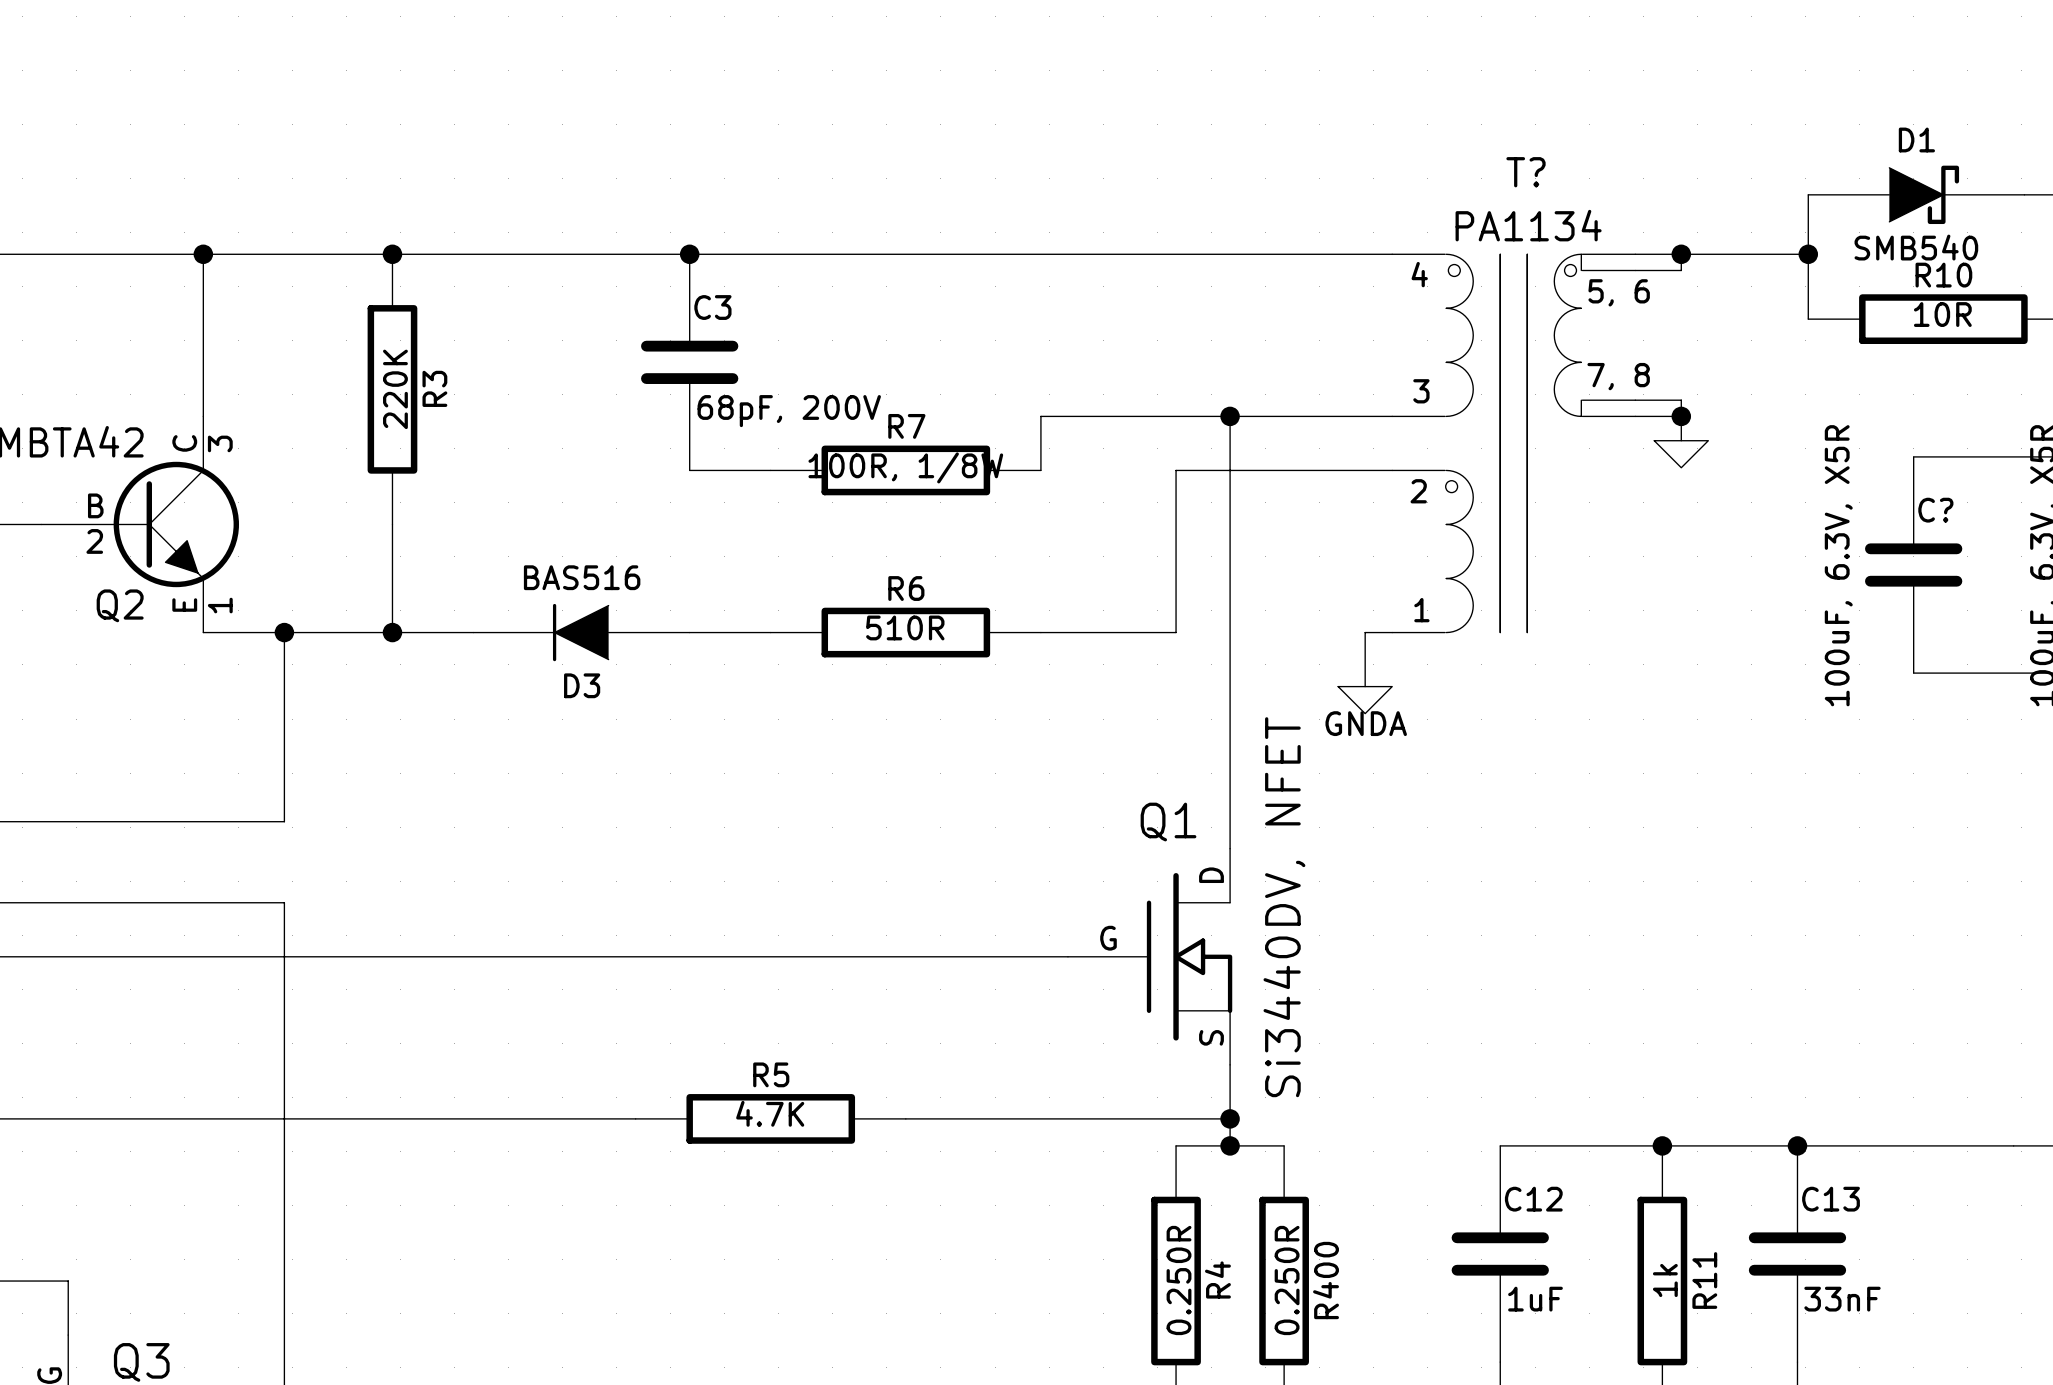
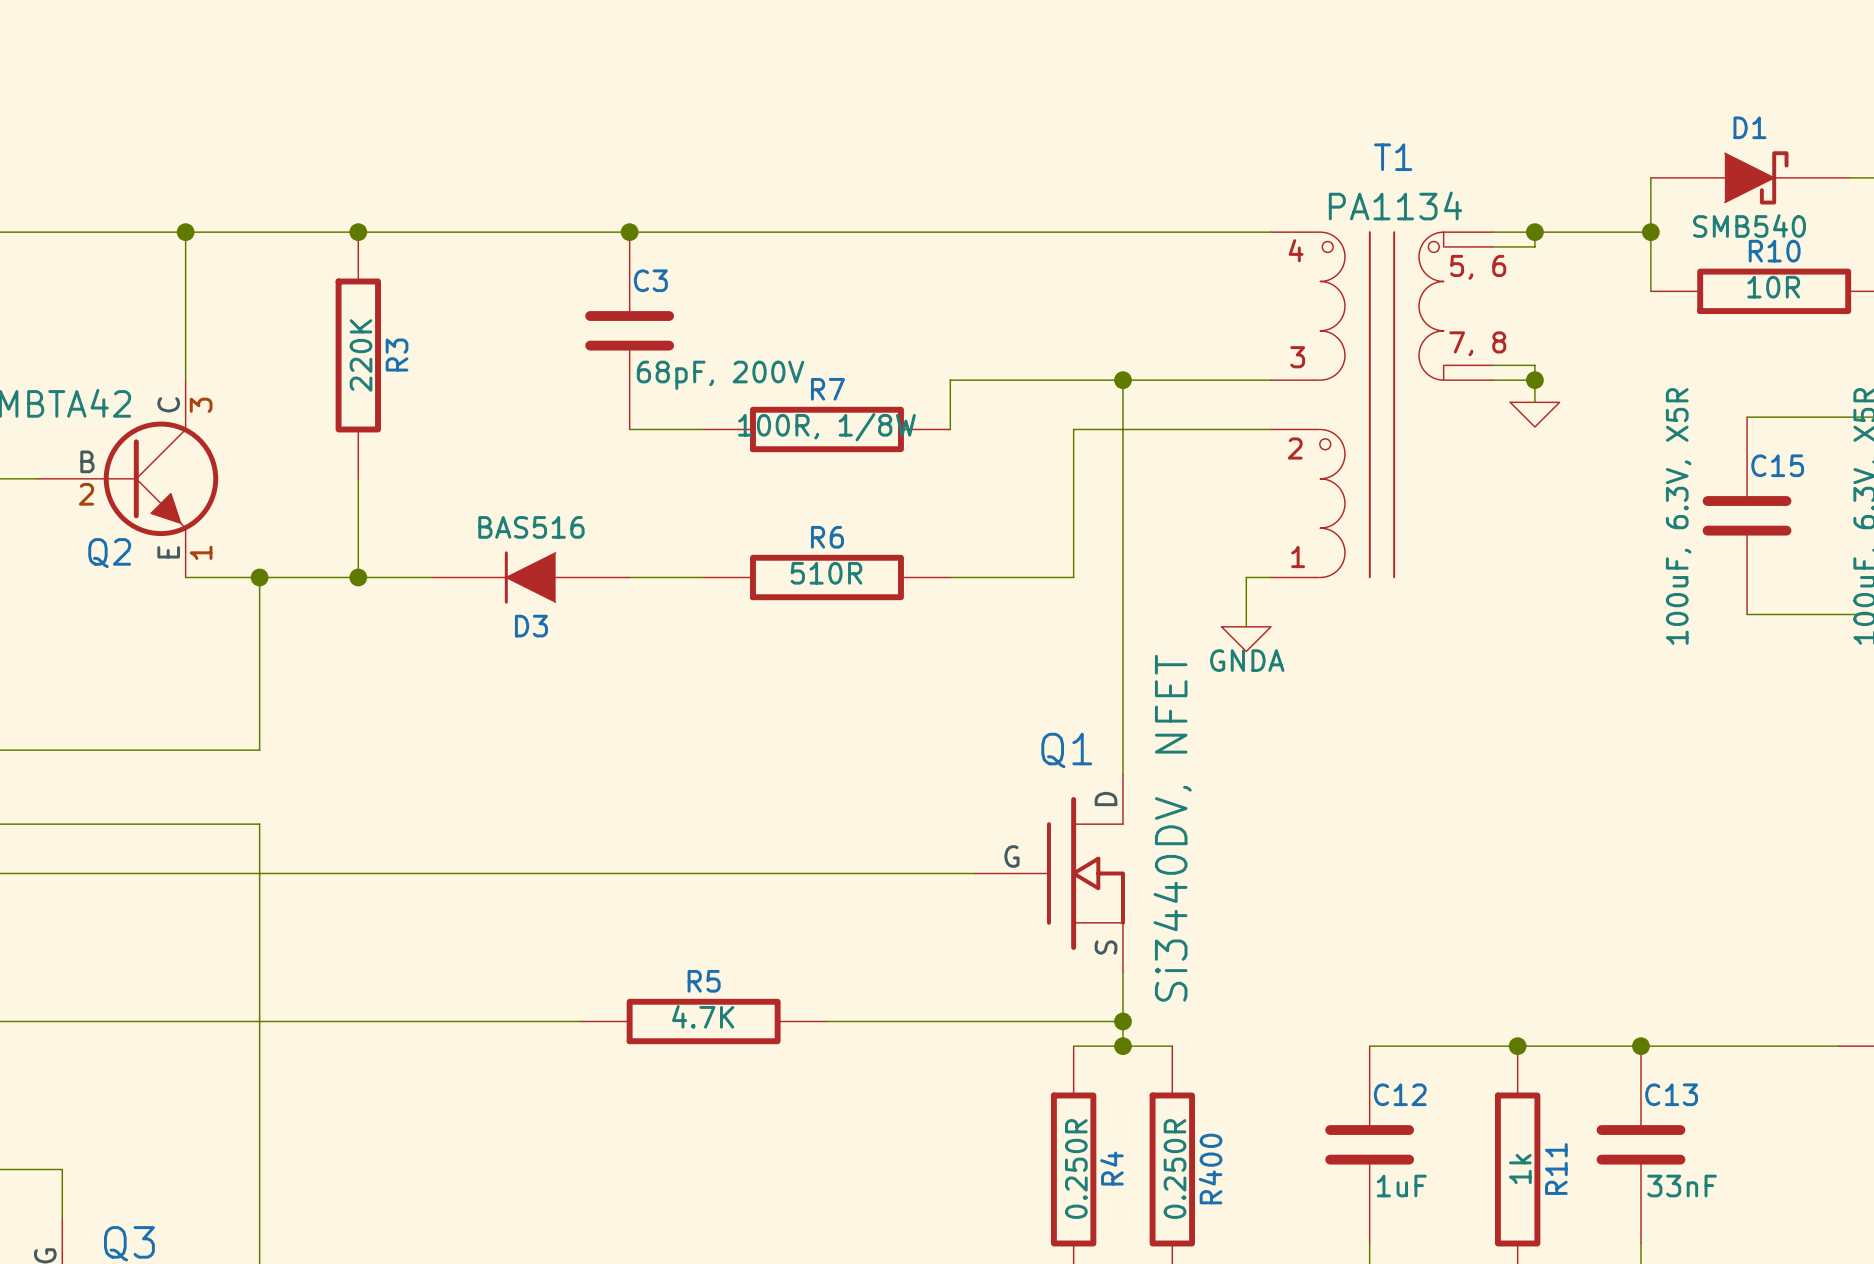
T? name: T? (1526, 172) -> T1 (1393, 157)
C? name: C? (1935, 510) -> C15 (1777, 465)

